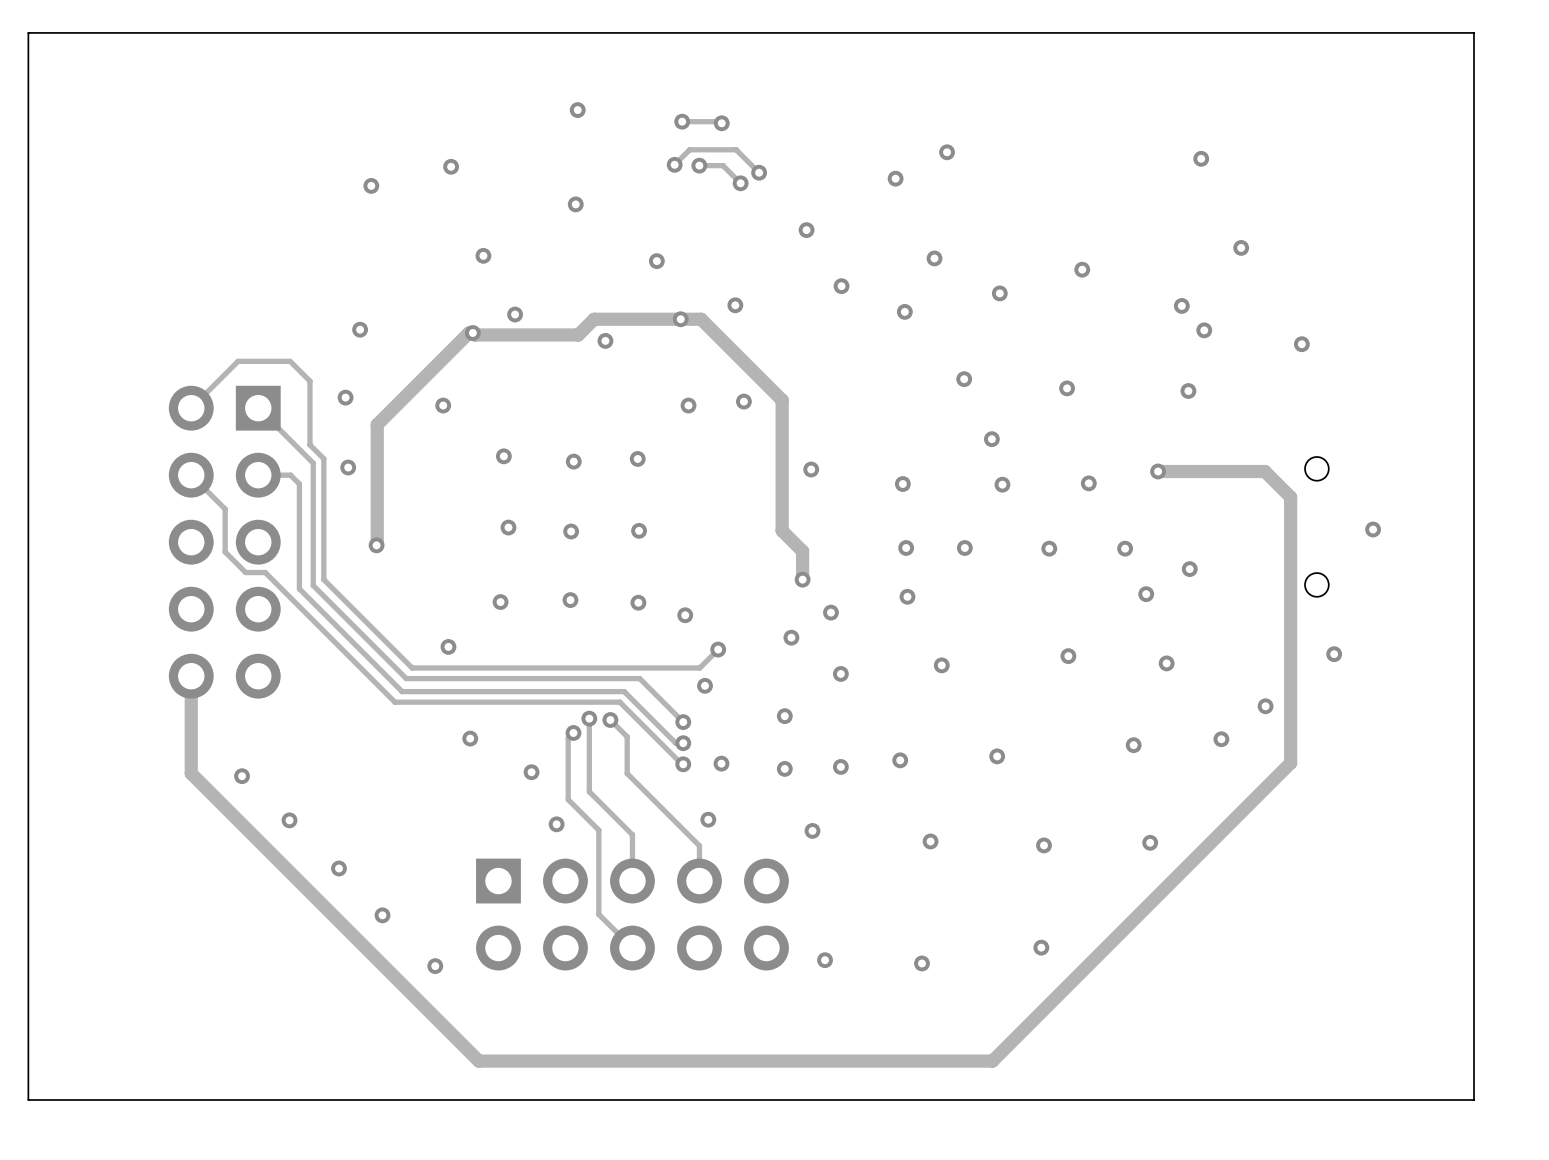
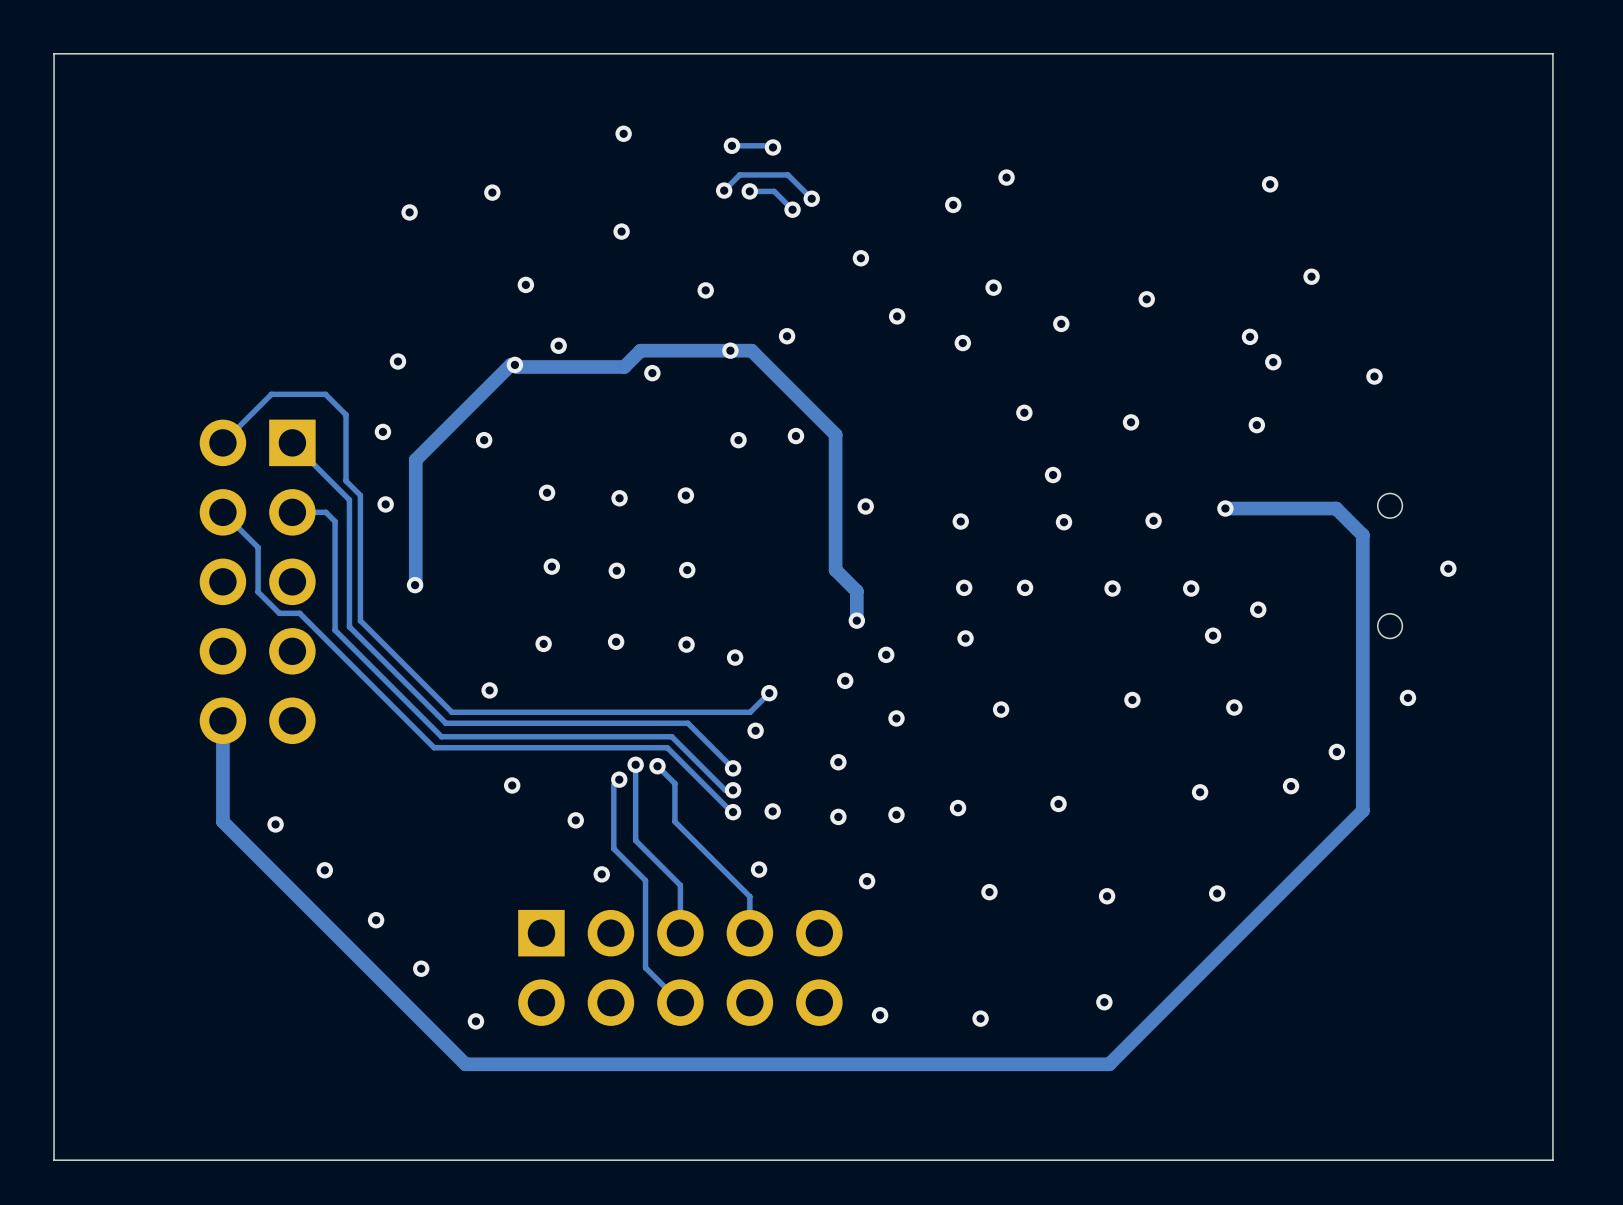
track: (1046, 1007) (992, 1061) (478, 1061) (425, 1007) -> (1109, 1064) (465, 1064)

